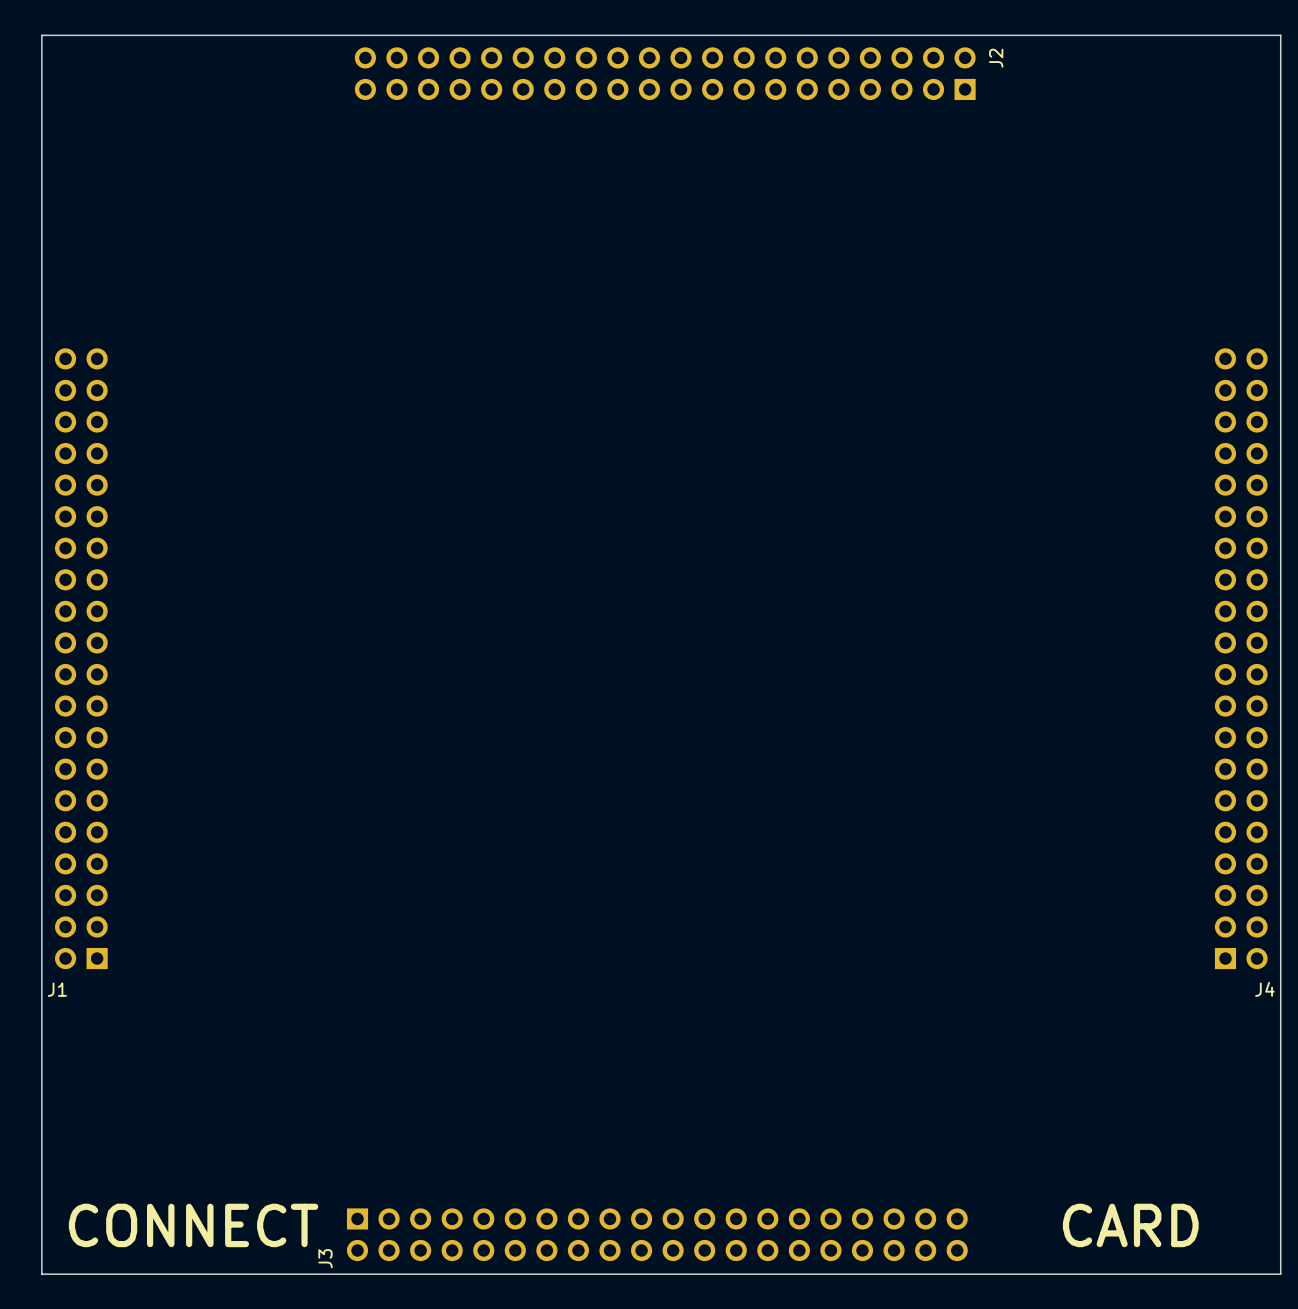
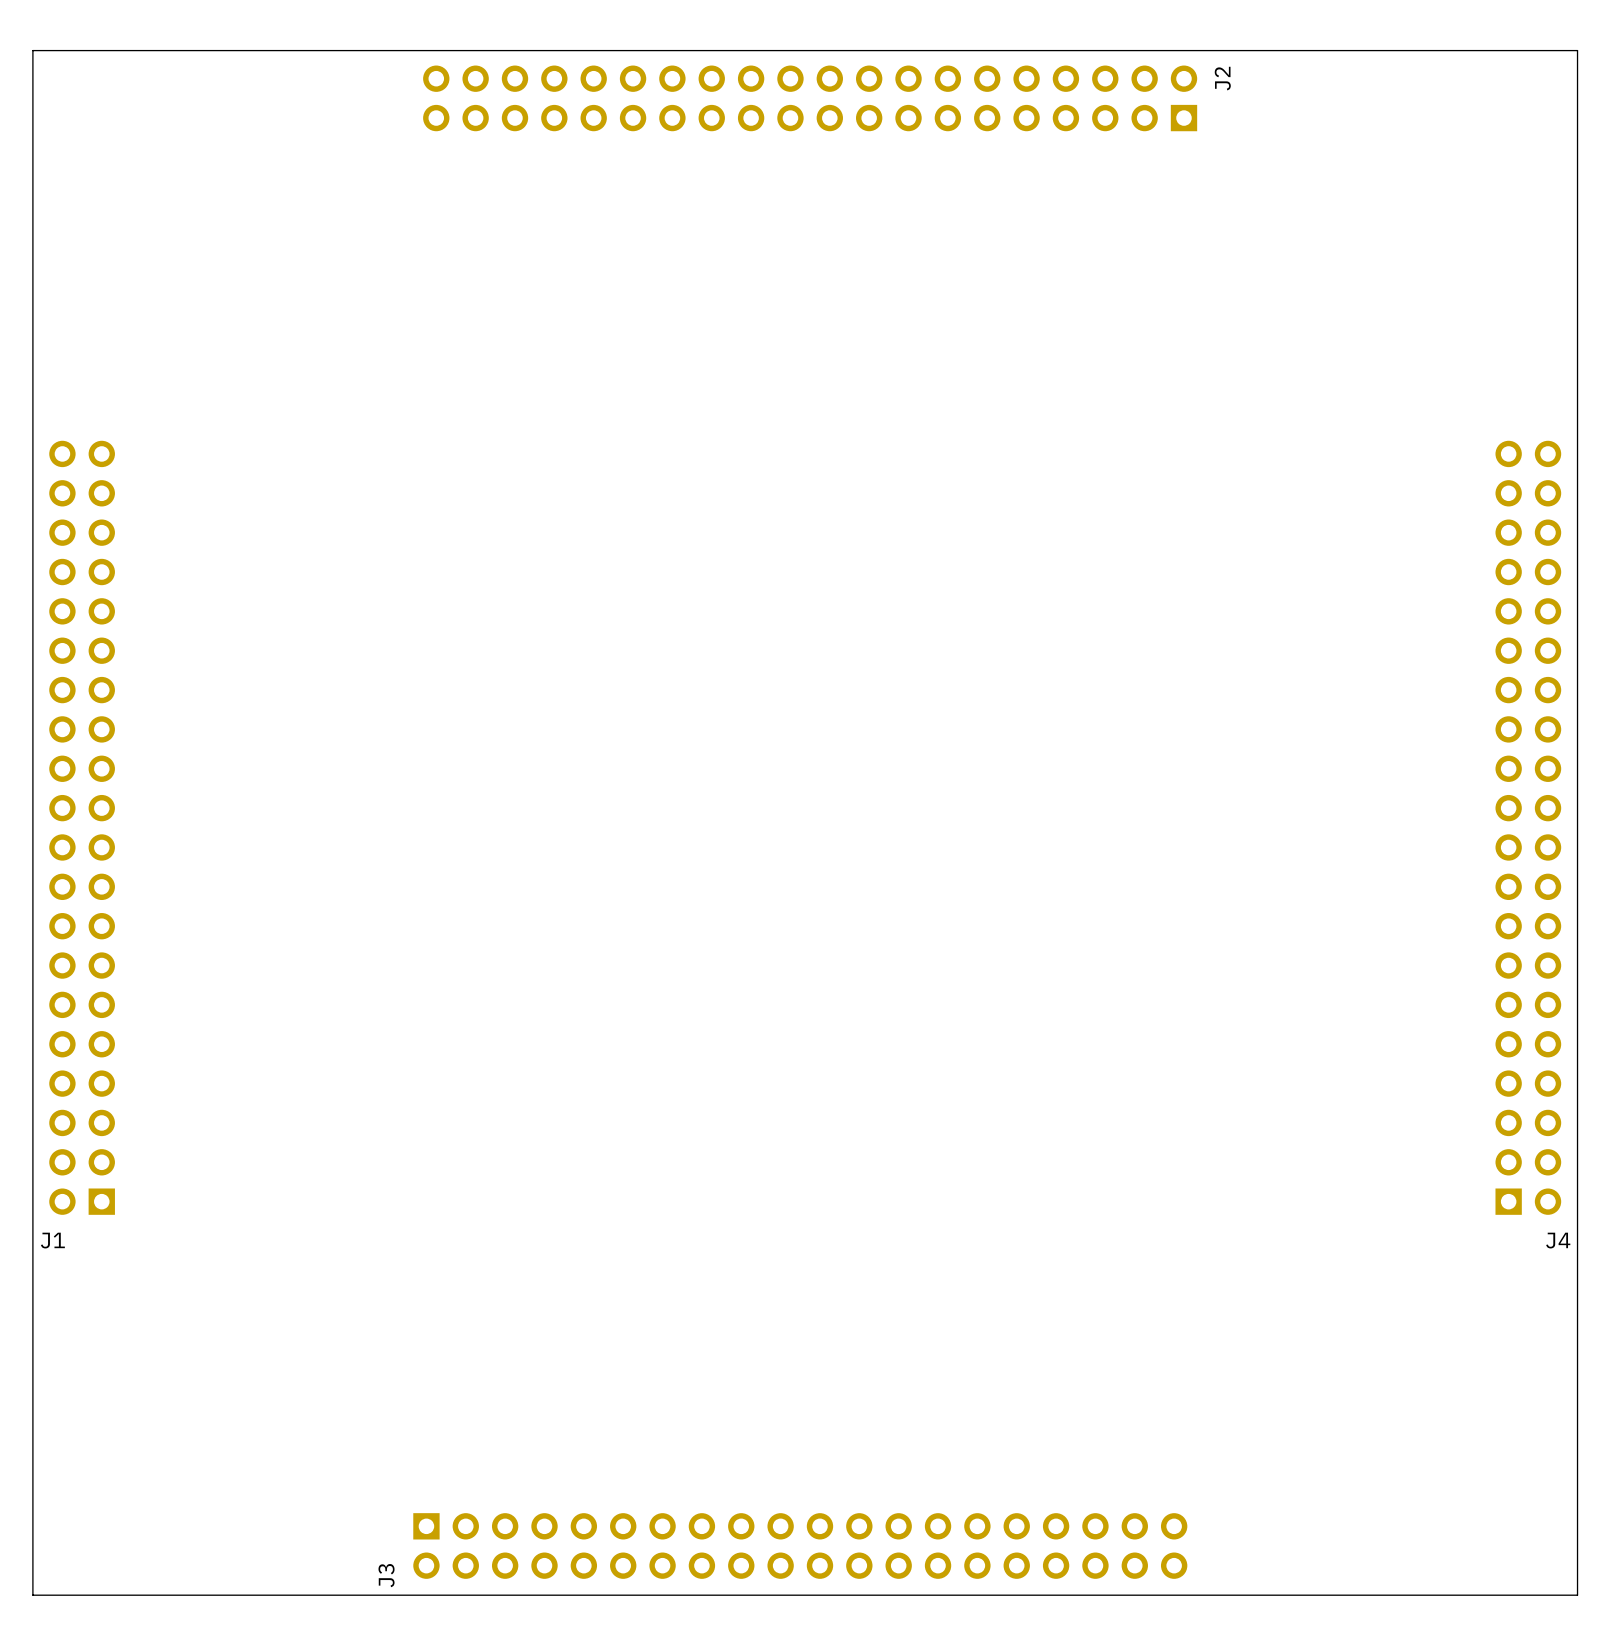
text: CONNECT (193, 1225) -> none
text: CARD (1130, 1225) -> none

